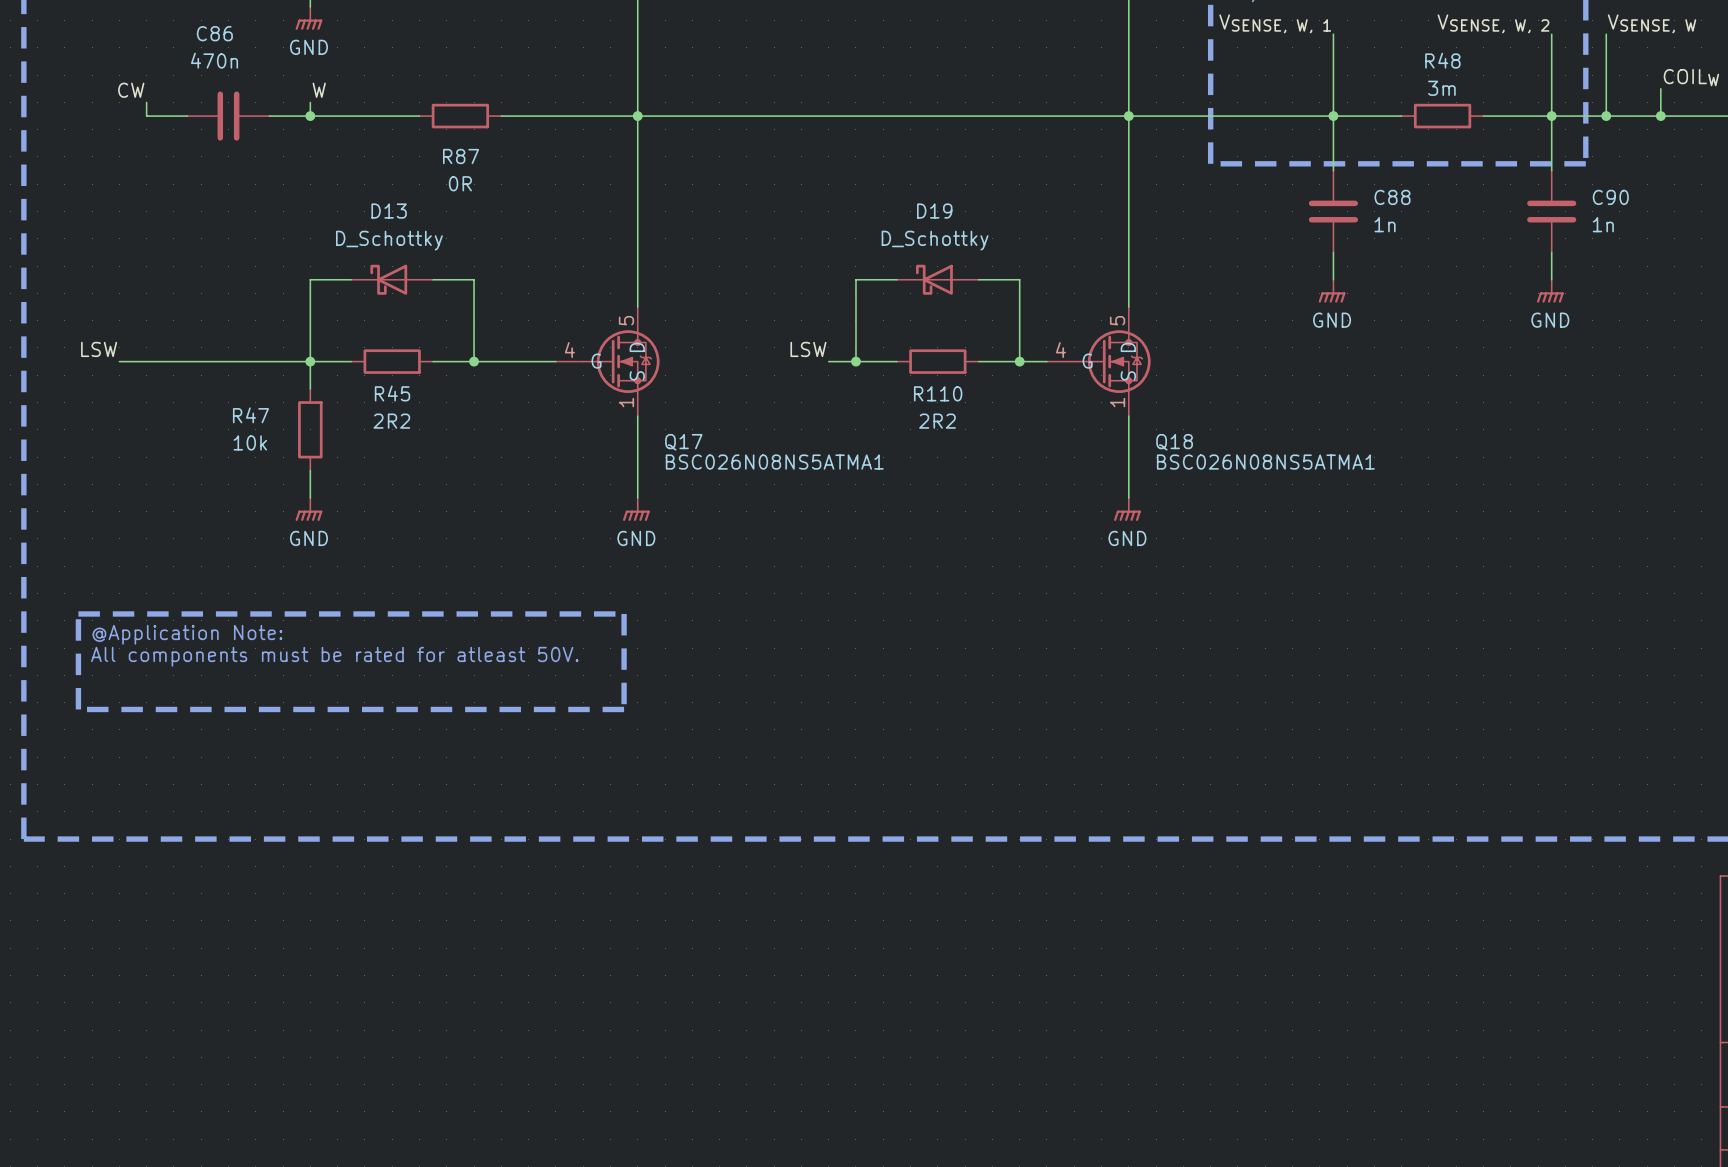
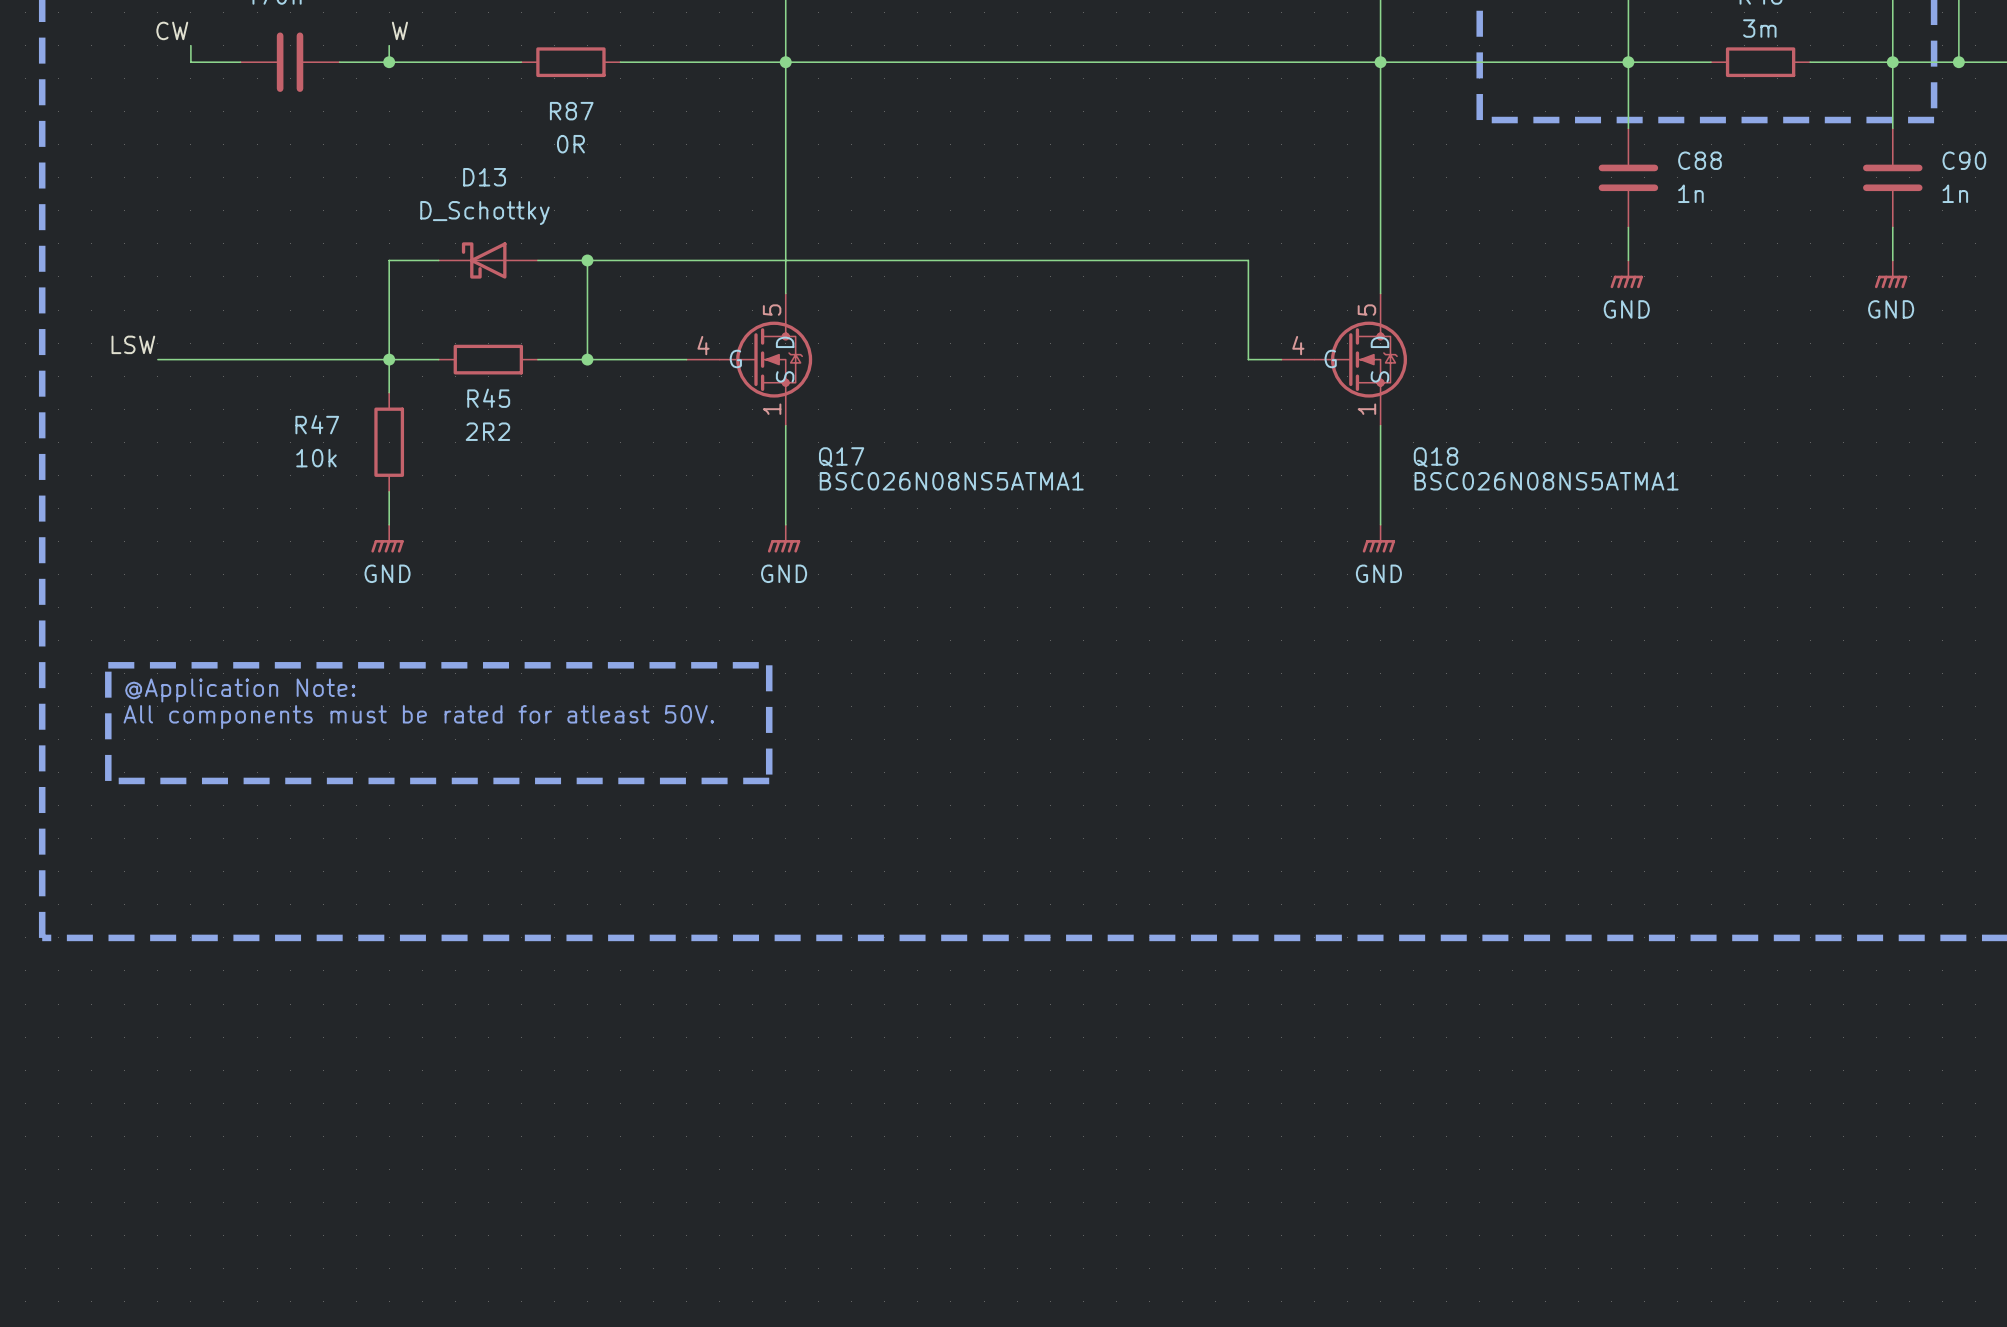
junction: none -> (587, 260)
wire: (855, 279) (855, 361) -> (1050, 260) (587, 260)
D19: D_Schottky (937, 279) -> none
label: LSW (808, 349) -> none
wire: (828, 361) (896, 361) -> none
junction: (855, 361) -> none
R110: 2R2 (937, 361) -> none
wire: (978, 361) (1019, 361) -> none
junction: (1019, 361) -> none

